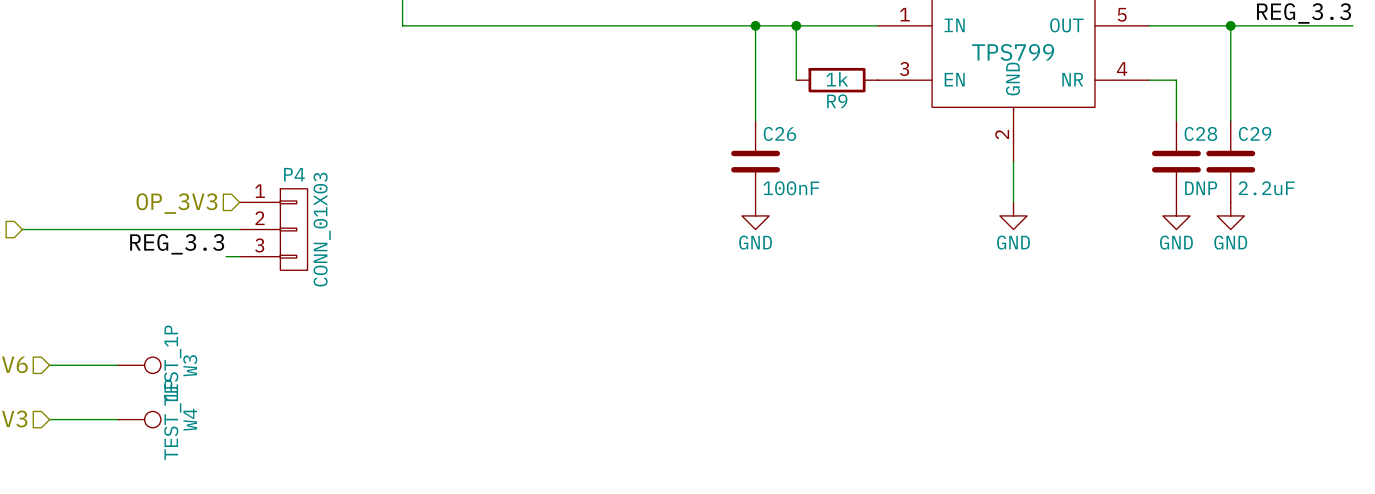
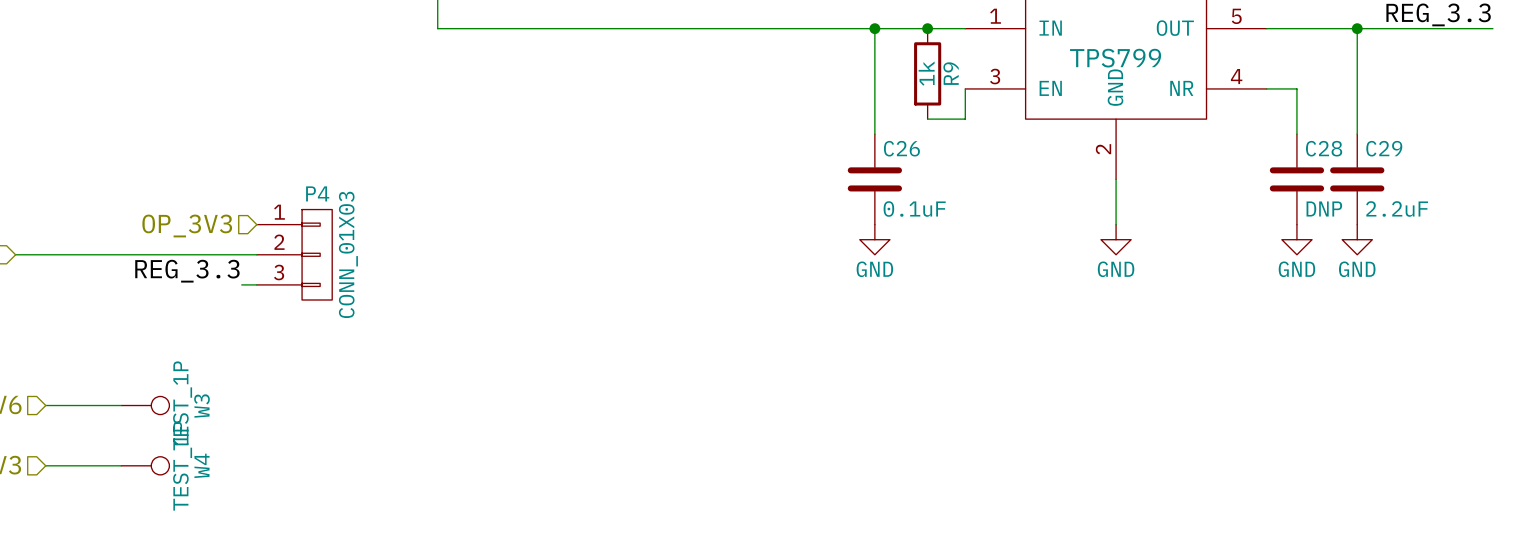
wire: (755, 25) (755, 120) -> none
junction: (755, 25) -> none
junction: none -> (927, 28)
wire: none -> (874, 88) (874, 134)
R9 rotation: 0° (837, 80) -> 90° clockwise (927, 73)
wire: none -> (965, 88) (965, 119) (927, 119)
R9 name position: R9 (837, 101) -> R9 (951, 73)
C26 position: (755, 161) -> (874, 179)
C26 value: 100nF (791, 188) -> 0.1uF (914, 208)
power symbol position: GND (755, 215) -> GND (874, 239)

